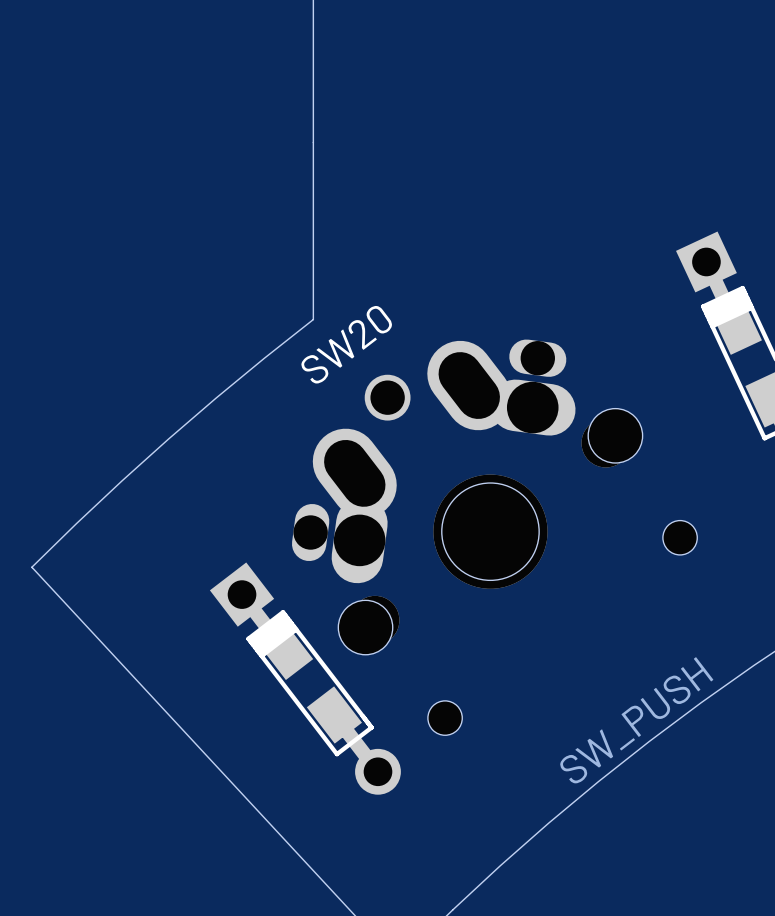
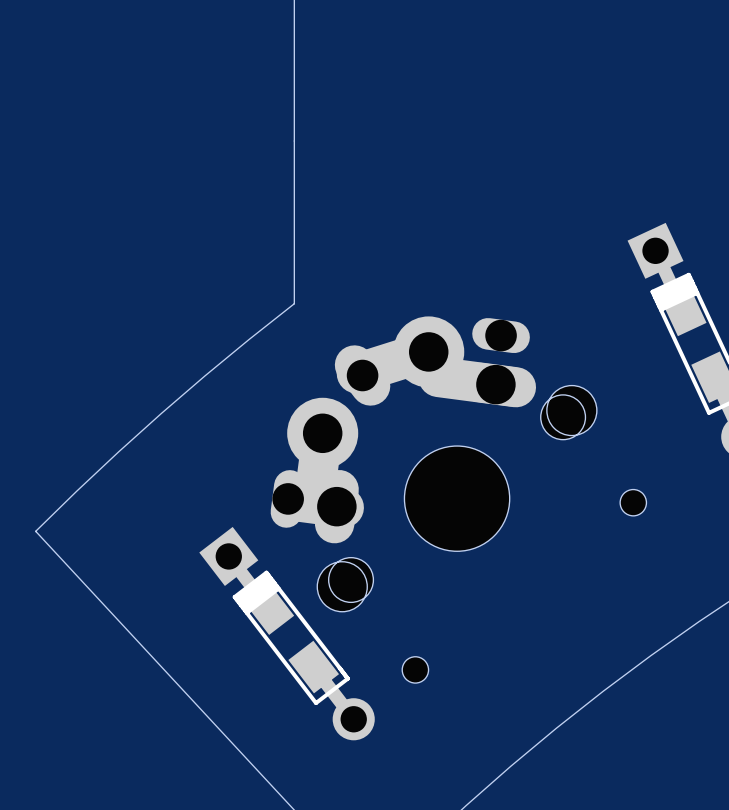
part: none -> (458, 499)
SW20: SW_PUSH (494, 537) -> none

